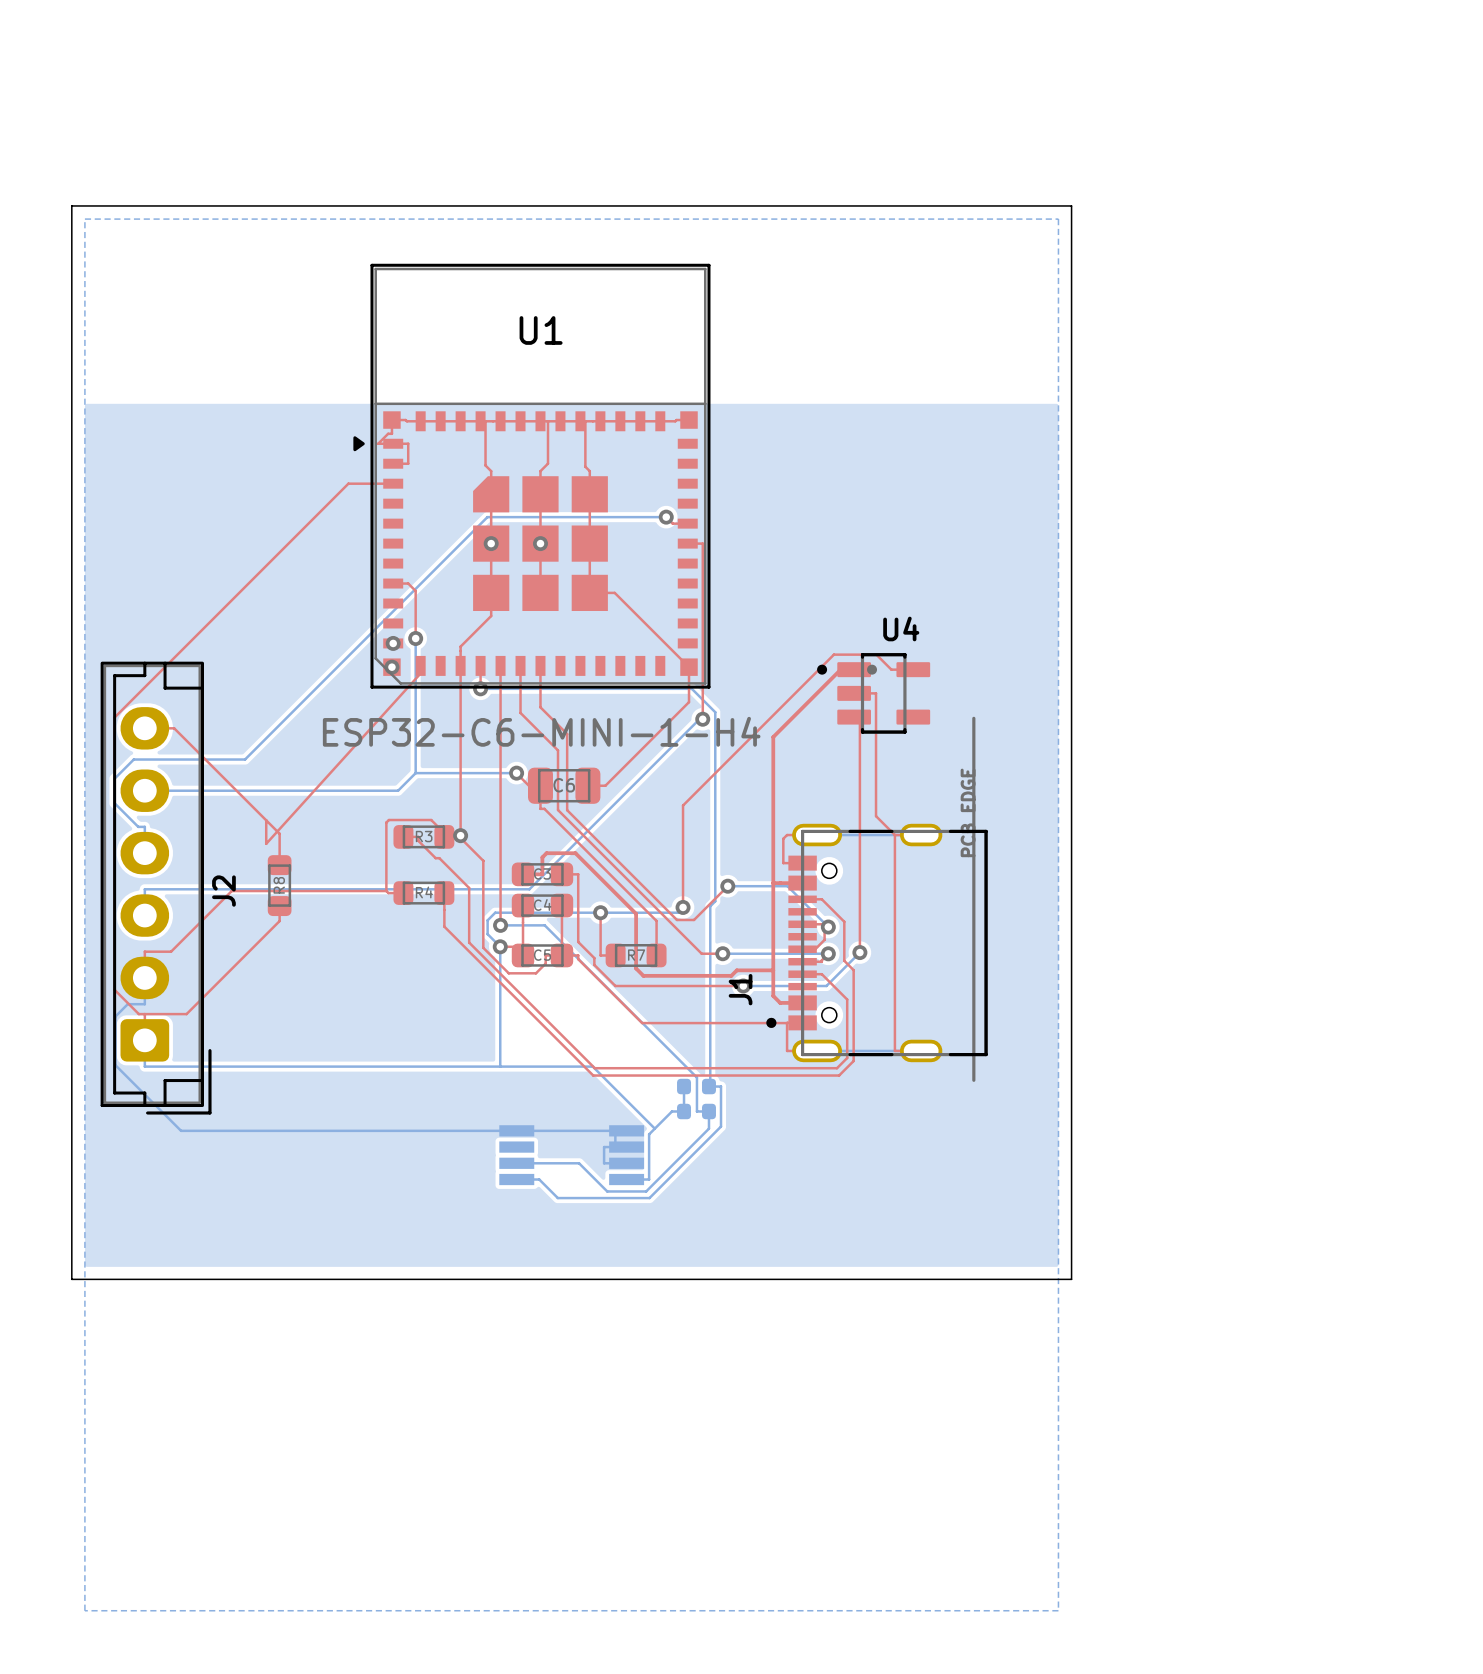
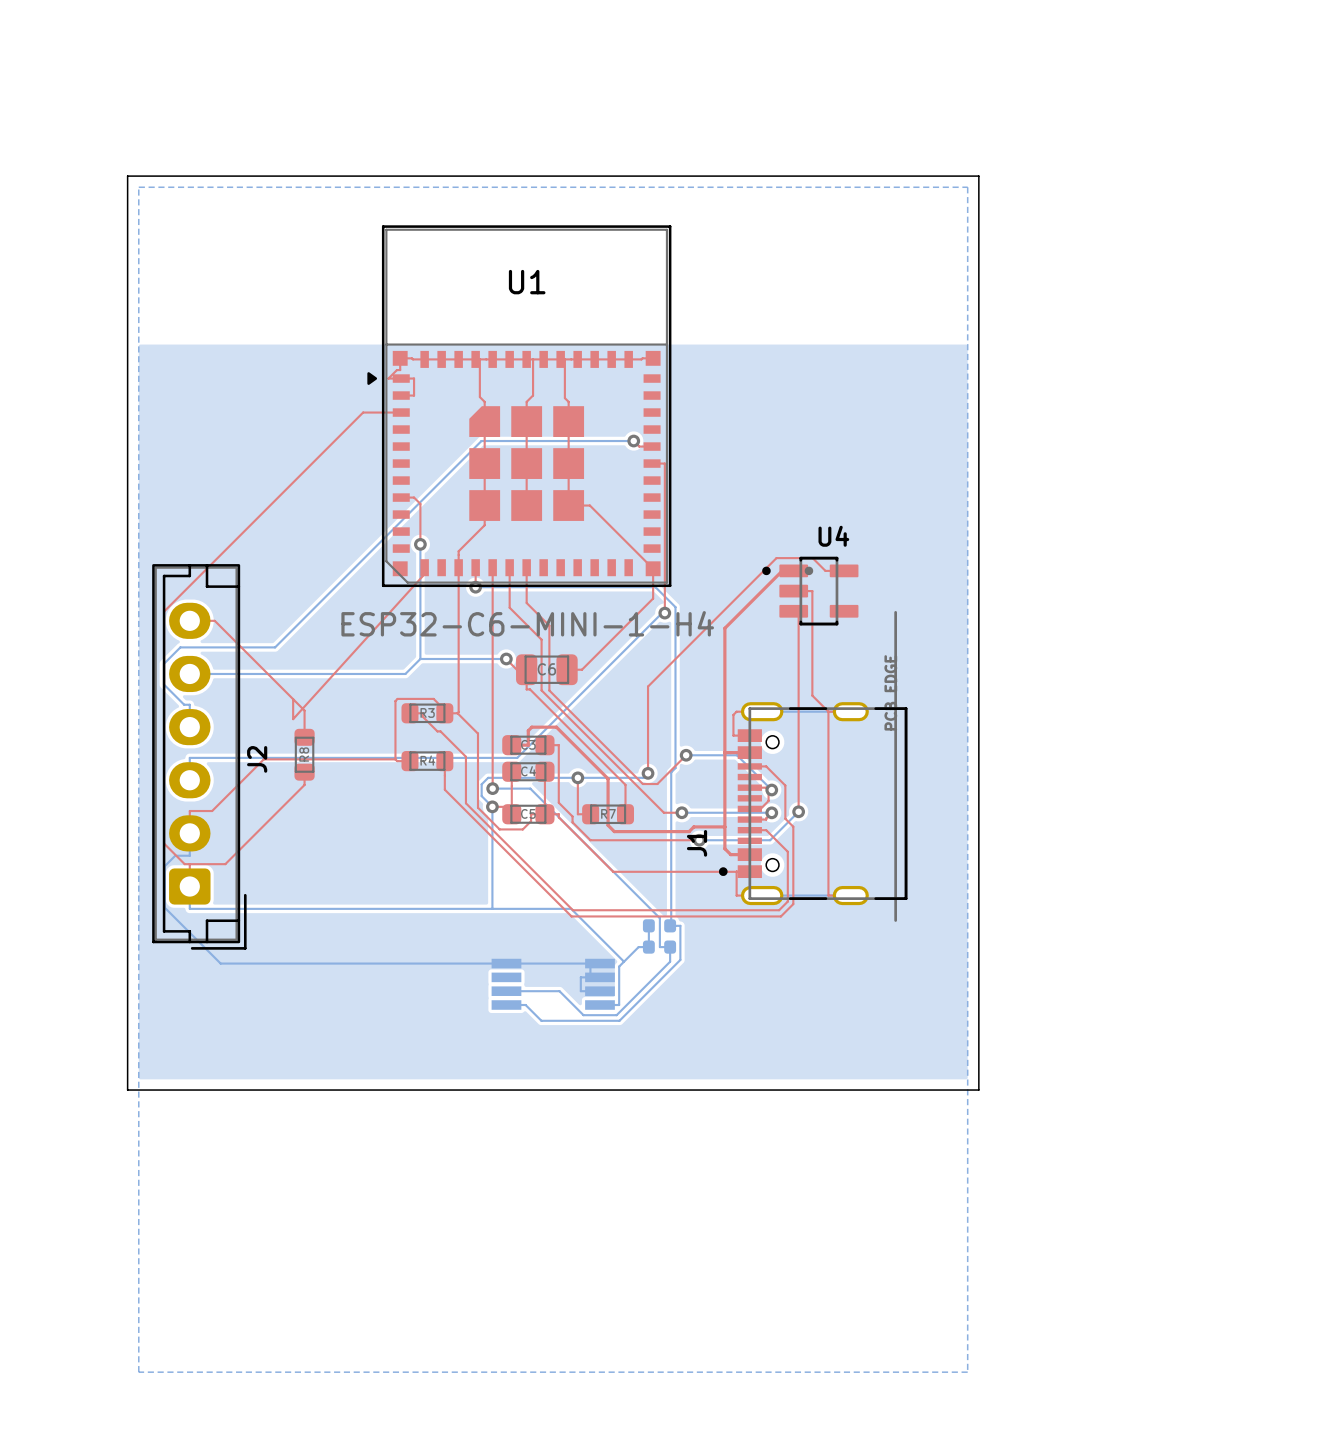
via: (491, 543) -> none
via: (540, 543) -> none
via: (393, 643) -> none
via: (391, 667) -> none
via: (460, 835) -> none

